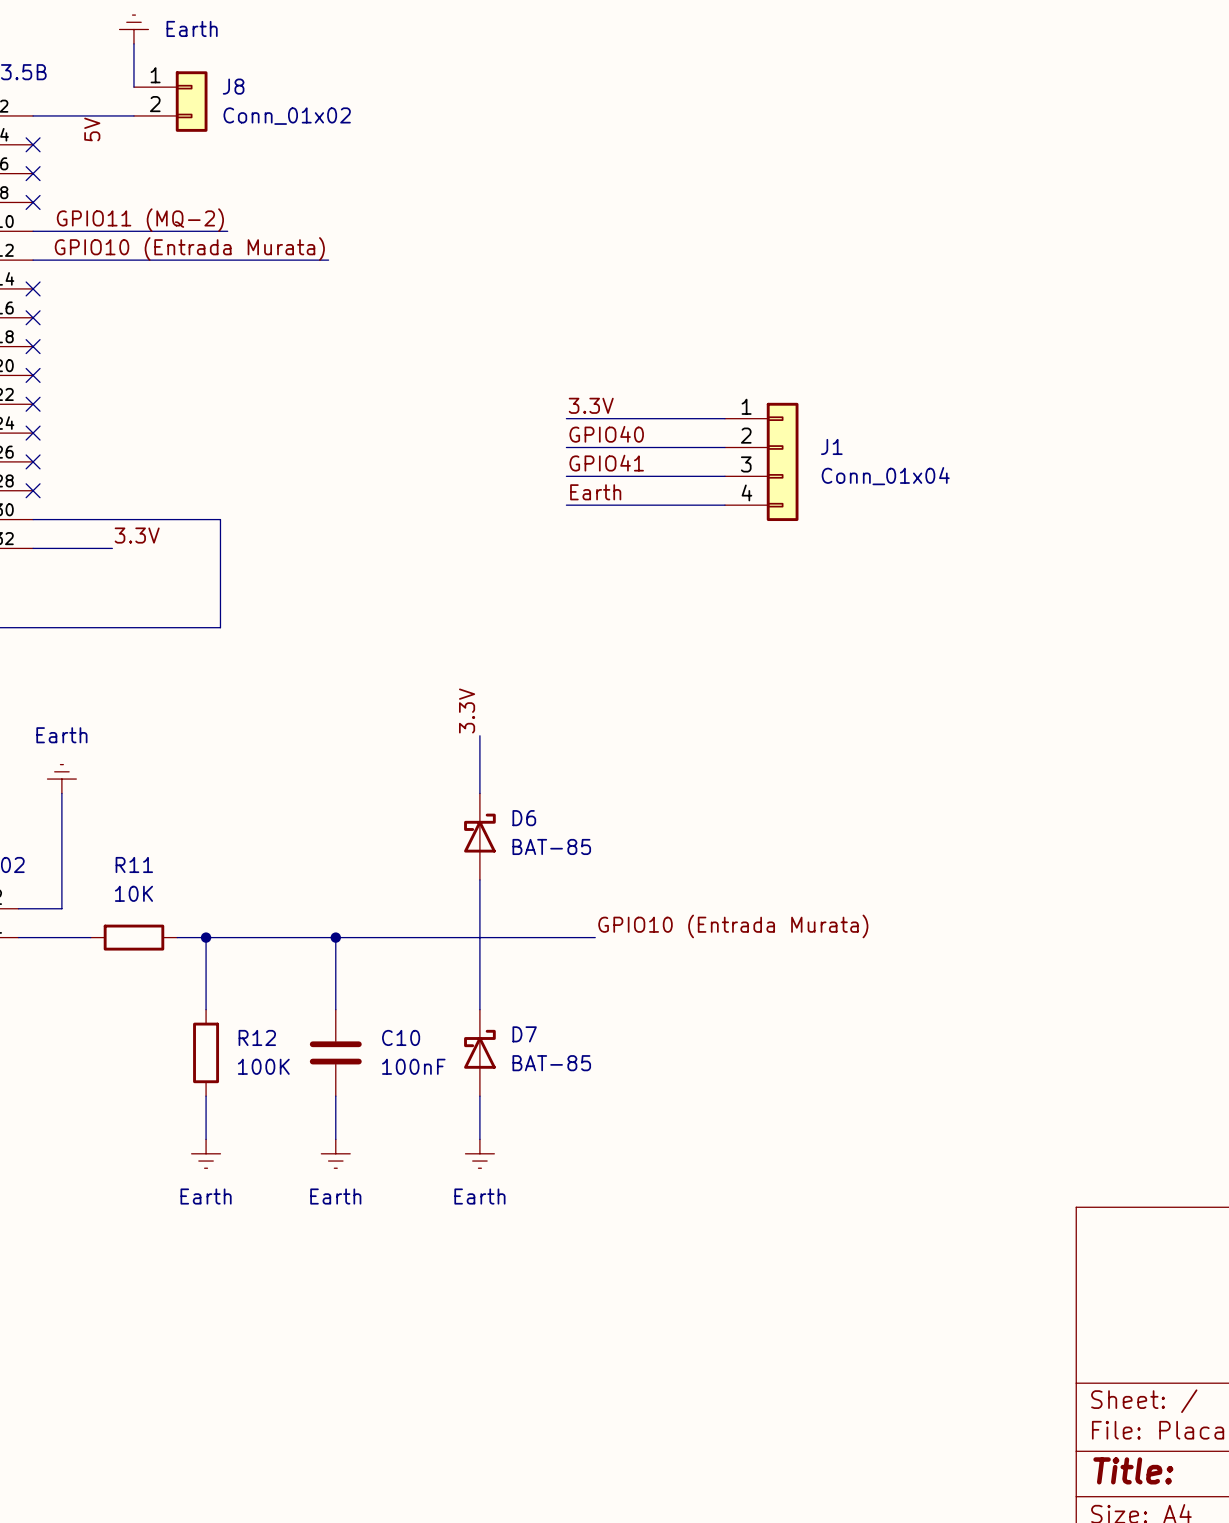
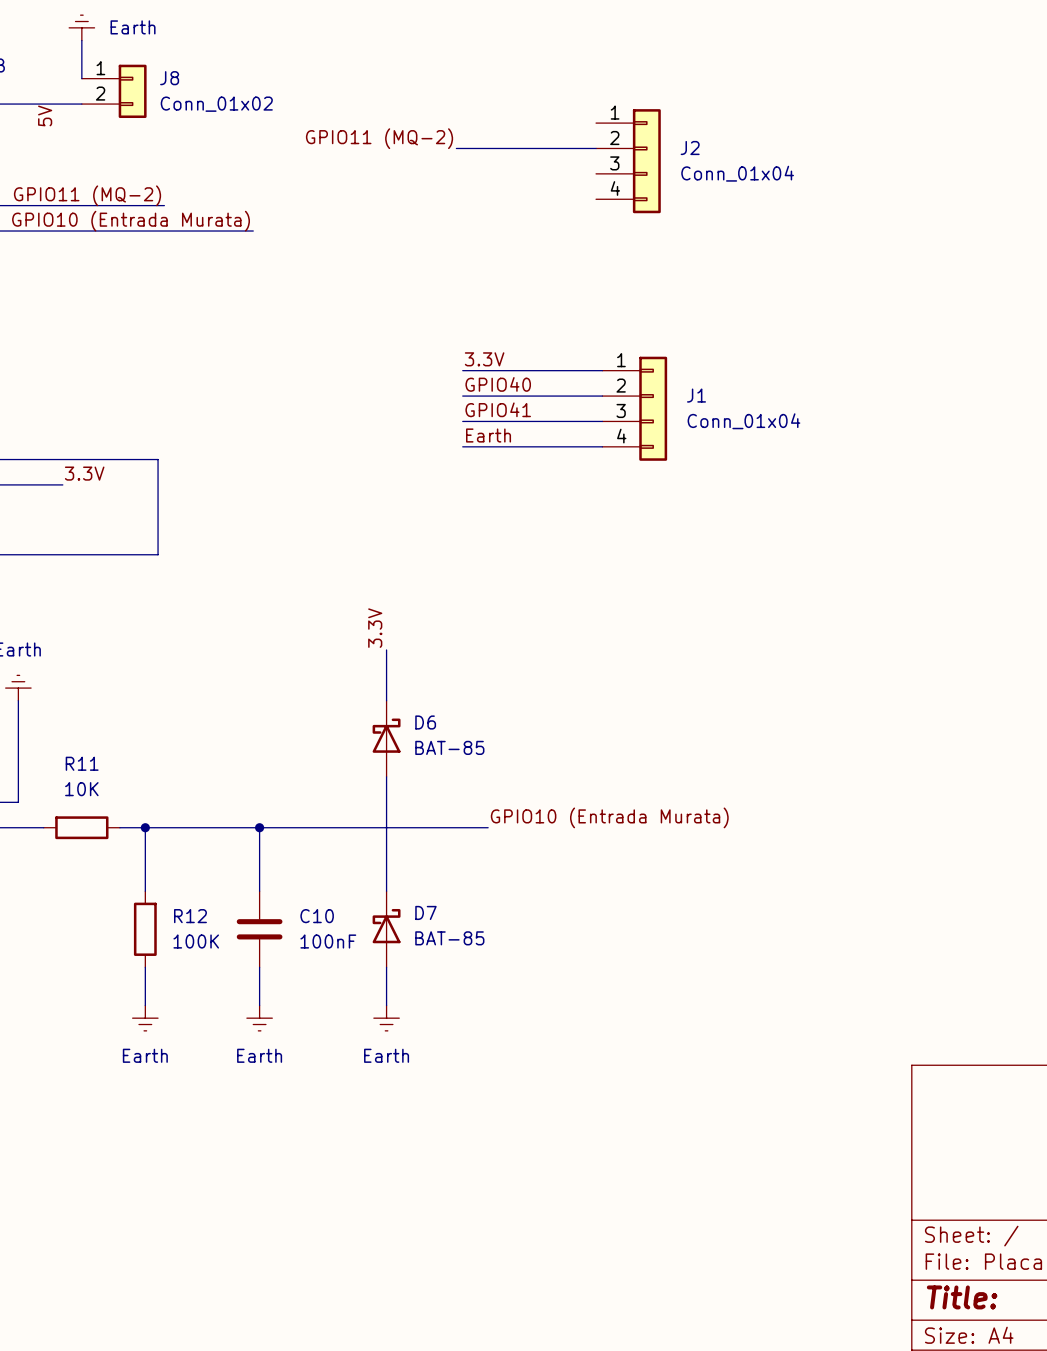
label: none -> GPIO11 (MQ-2) (379, 138)
wire: none -> (456, 148) (596, 148)
J2: none -> Conn_01x04 (628, 161)

